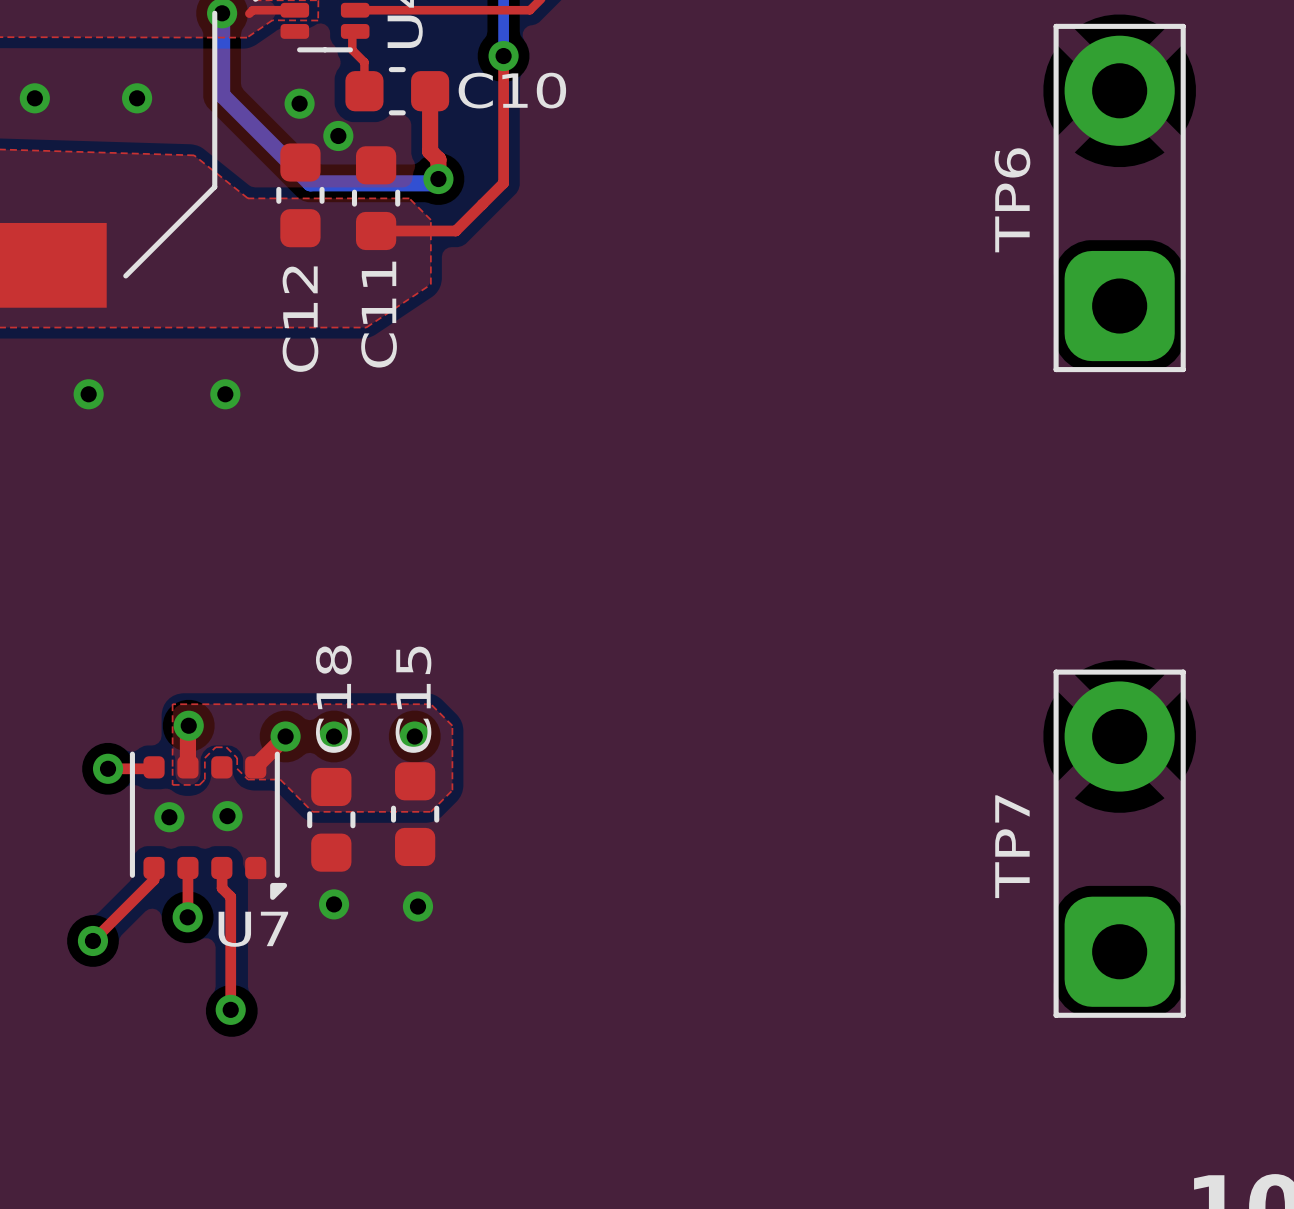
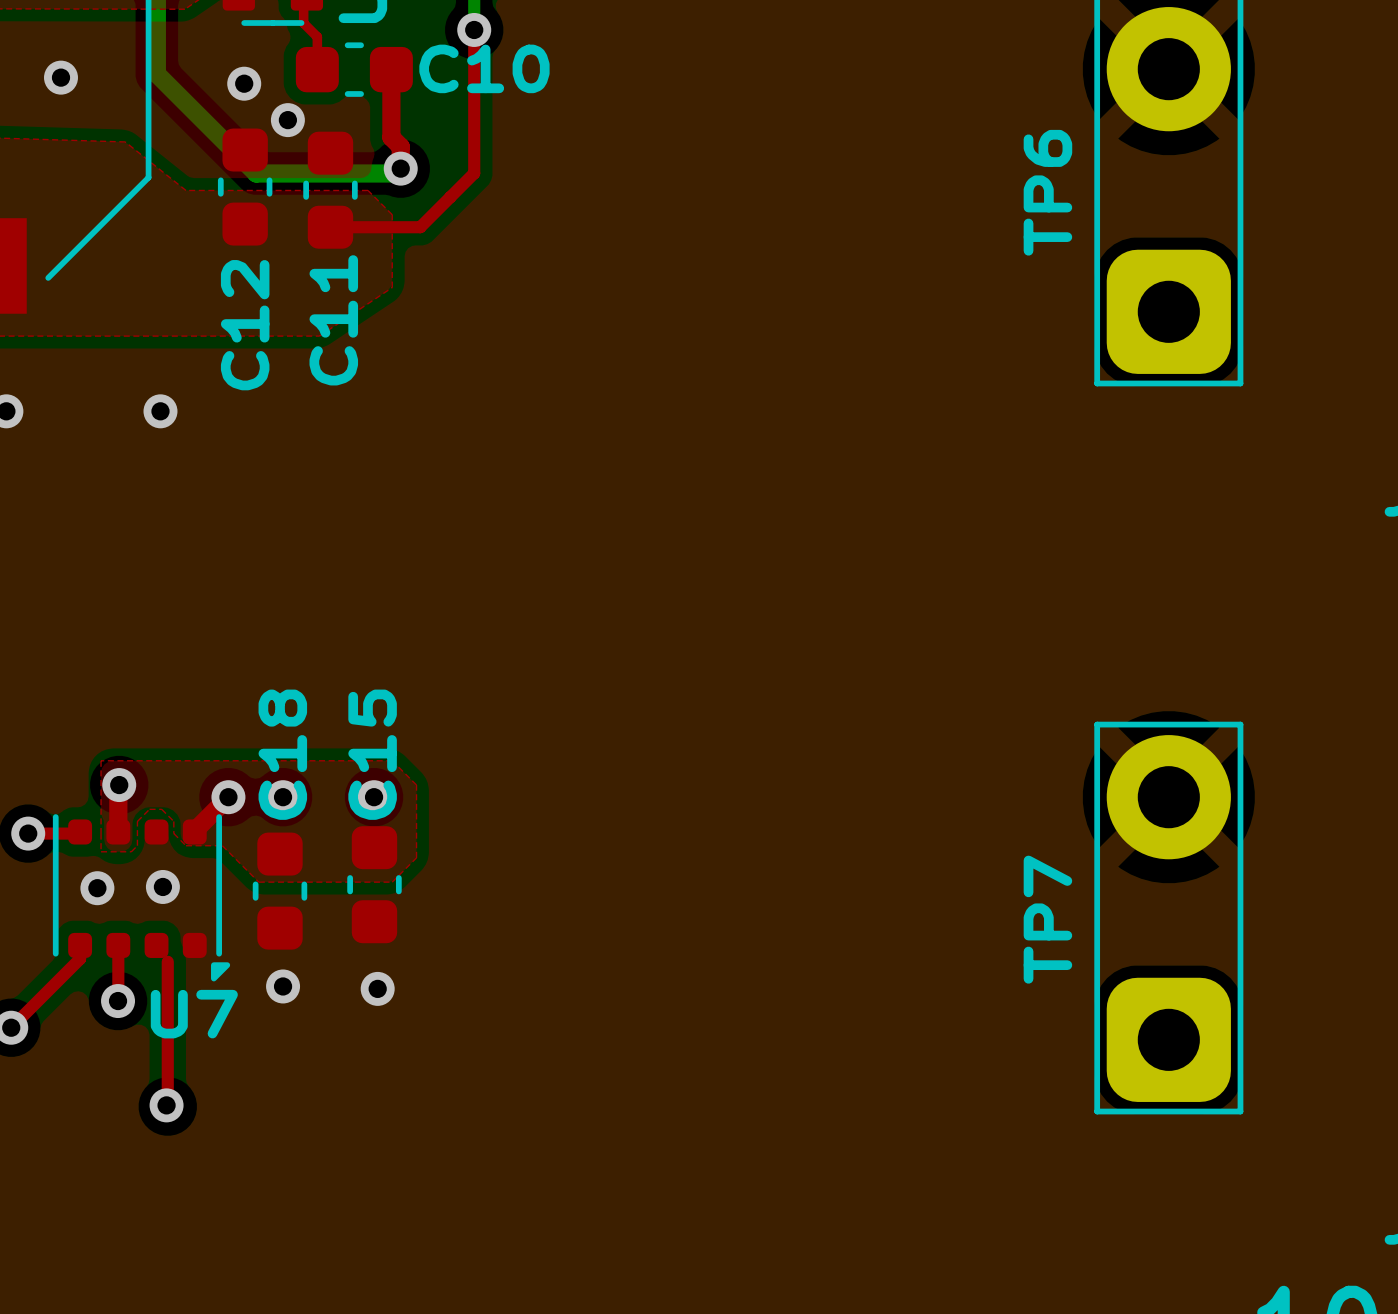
top track: (222, 868) (222, 888) (230, 896) (230, 1009) -> (167, 961) (167, 1106)

